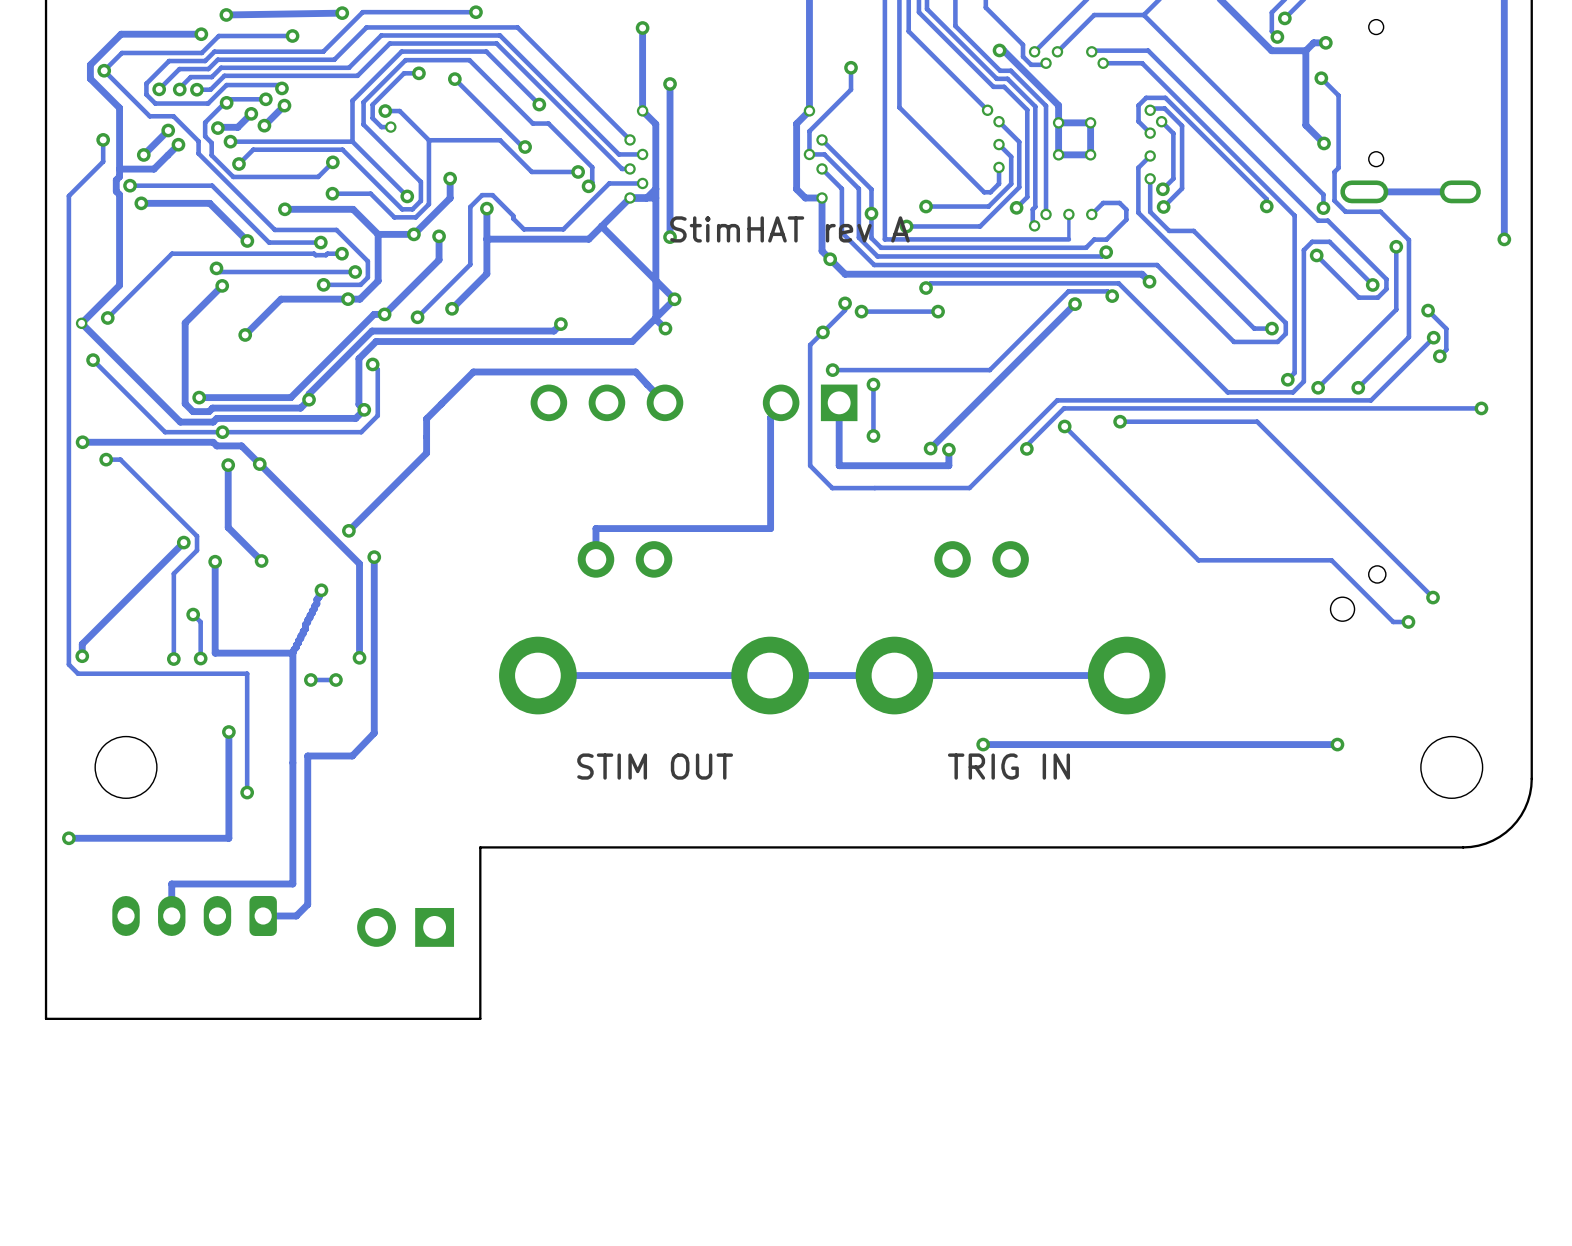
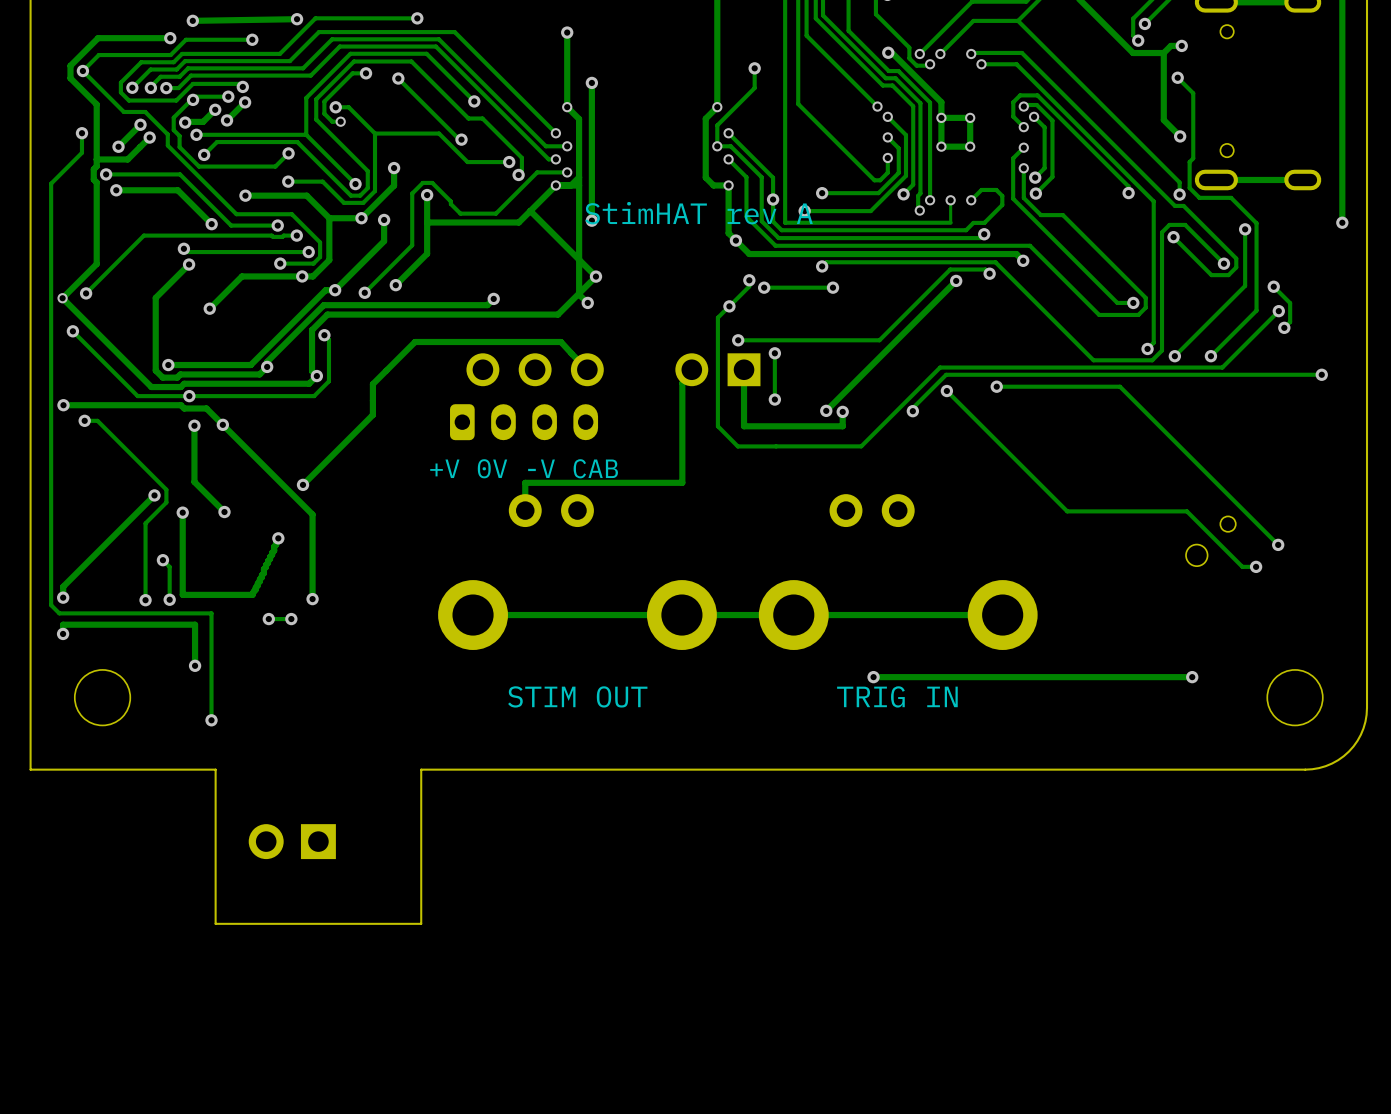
part: none -> (524, 422)
text: none -> +V 0V -V CAB (524, 468)
track: (374, 557) (374, 733) (352, 755) (307, 755) (307, 904) (296, 915) (263, 915) -> none
via: (374, 557) -> none
track: (292, 653) (292, 883) (171, 883) (171, 915) -> none
via: none -> (63, 633)
track: (228, 731) (228, 838) (68, 838) -> (195, 665) (195, 624) (63, 624) (63, 633)
via: (68, 838) -> none
board edge: (46, 847) (46, 1018) (251, 1018) -> (30, 769) (215, 769) (215, 923)
part: (194, 915) -> none
part position: (405, 927) -> (292, 841)

